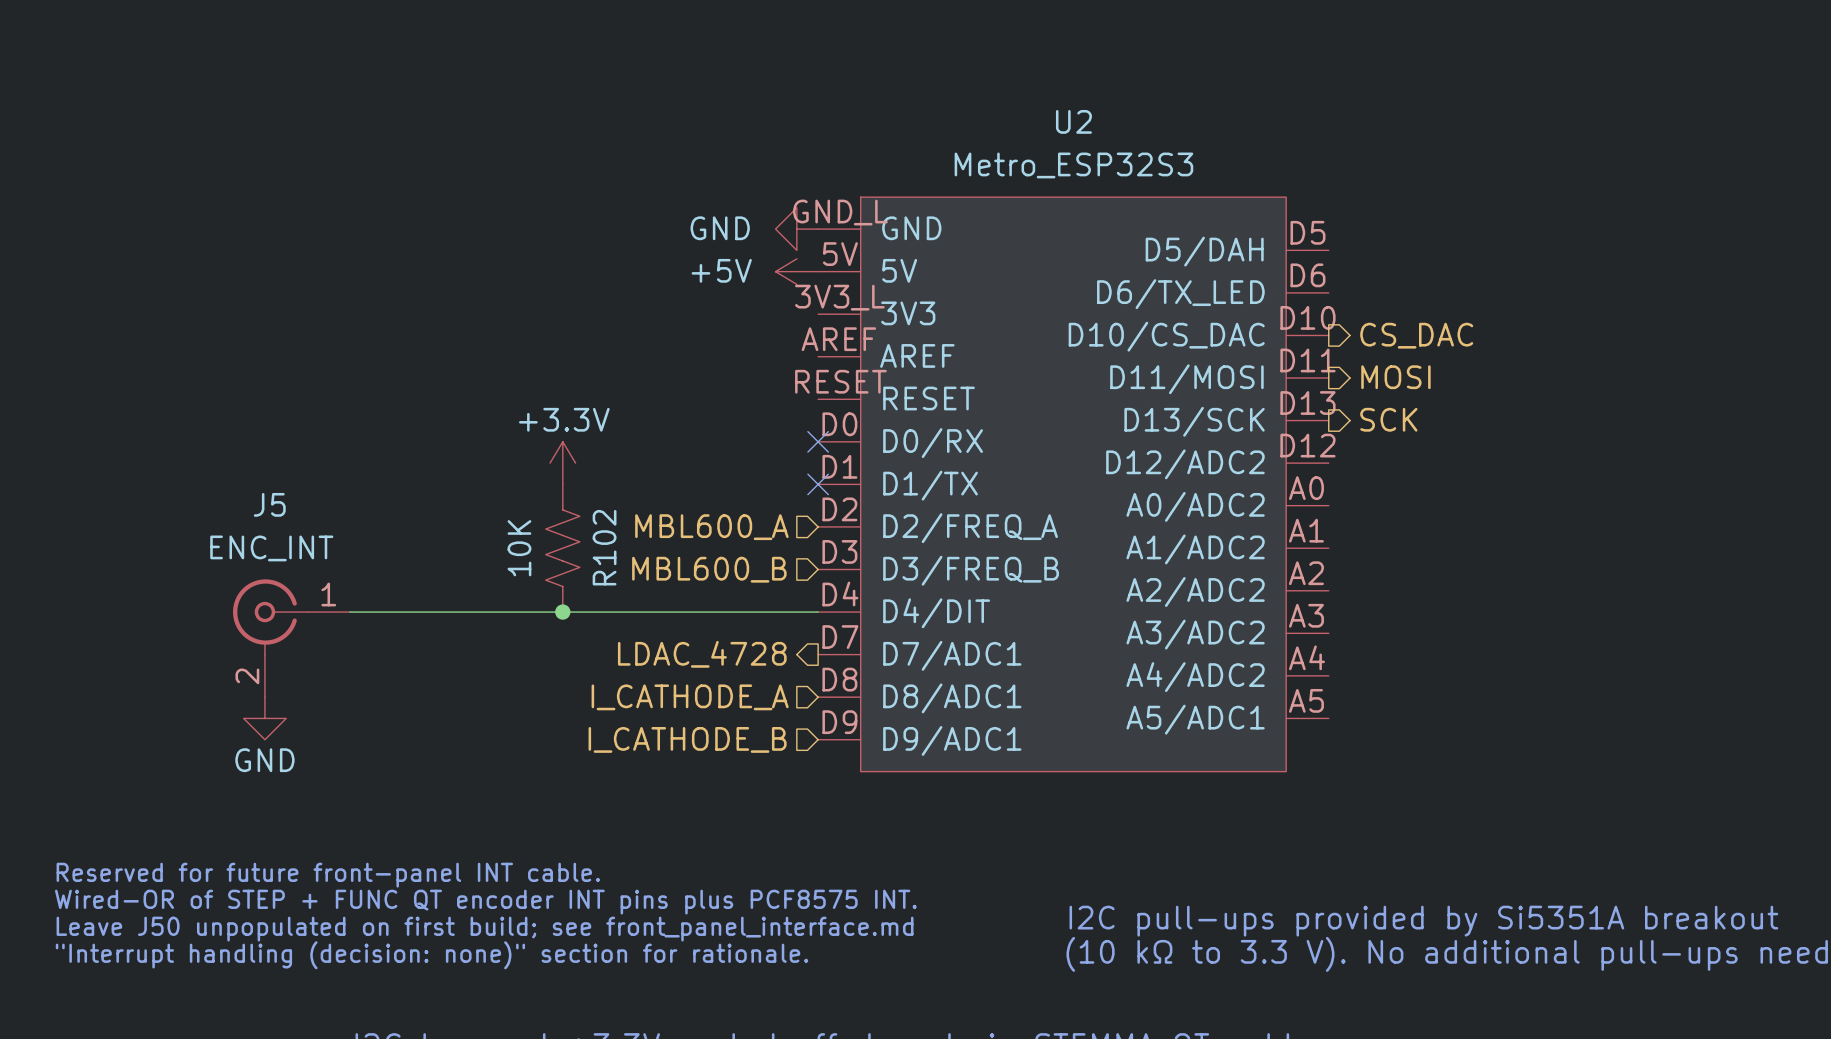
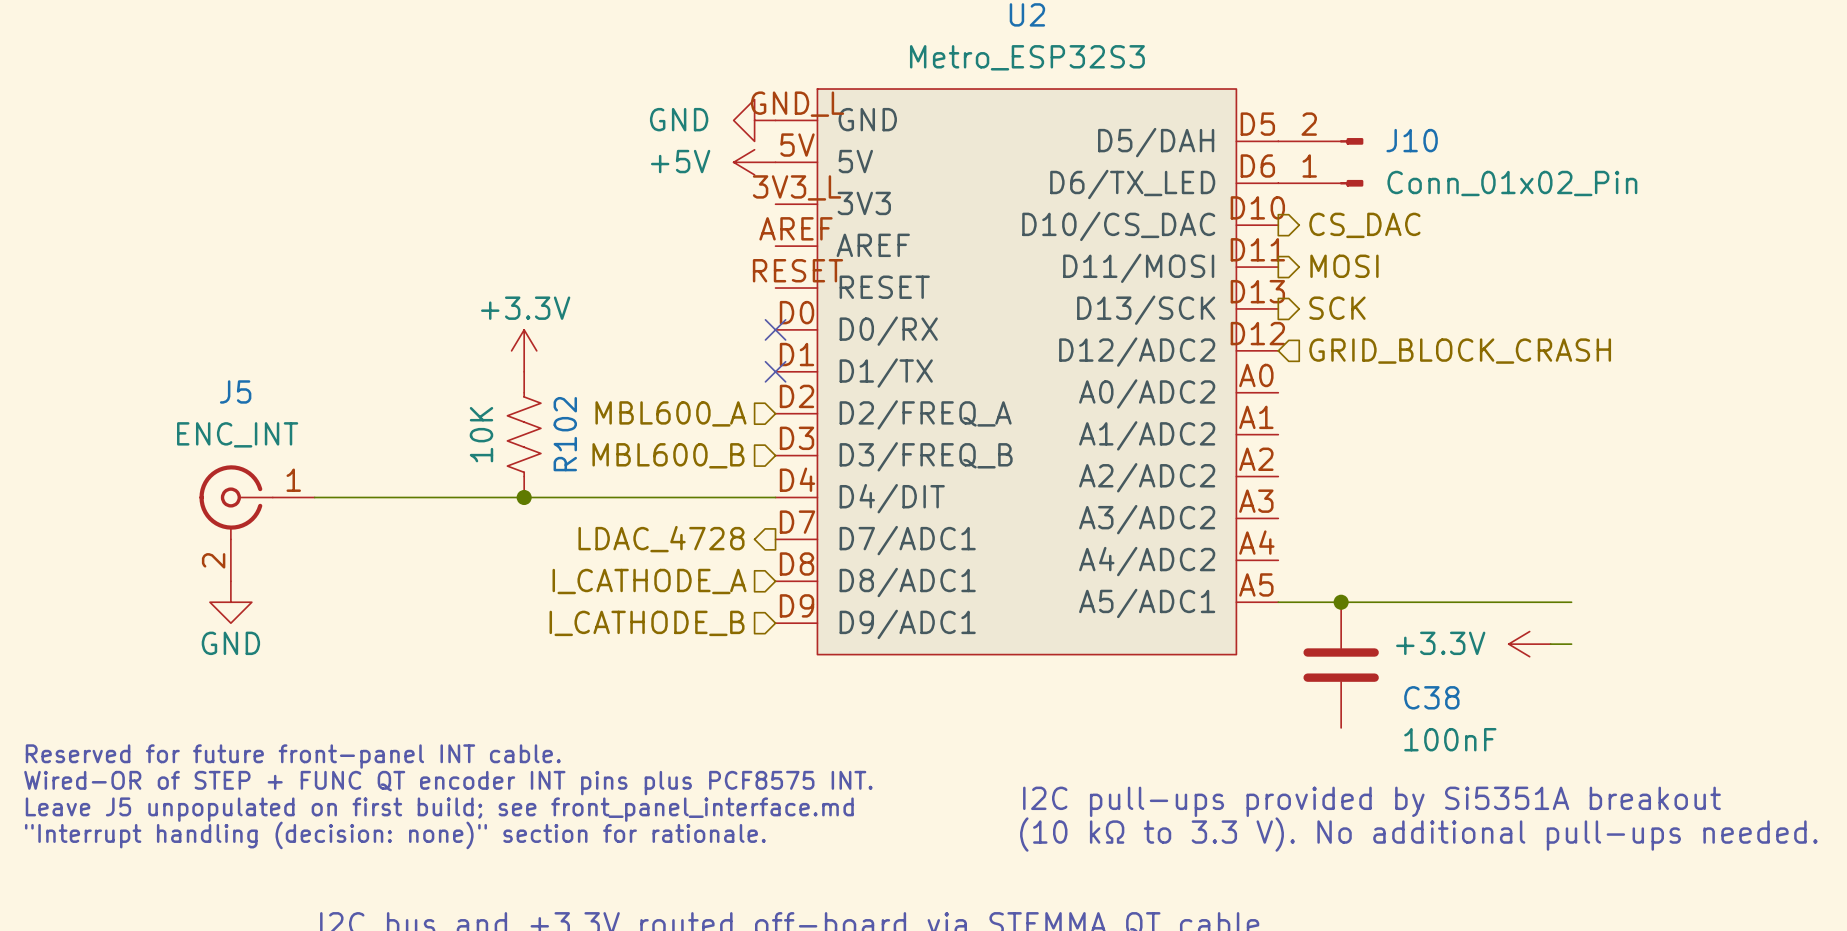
J10: none -> Conn_01x02_Pin (1320, 162)
hierarchical label: none -> GRID_BLOCK_CRASH (1460, 351)
wire: none -> (1278, 602) (1571, 602)
junction: none -> (1341, 602)
power symbol: none -> +3.3V (1529, 644)
wire: none -> (1550, 644) (1571, 644)
C38: none -> 100nF (1341, 665)
text: Leave J50 unpopulated on first build; see front_panel_interface.md (485, 929) -> Leave J5 unpopulated on first build; see front_panel_interface.md (439, 809)

